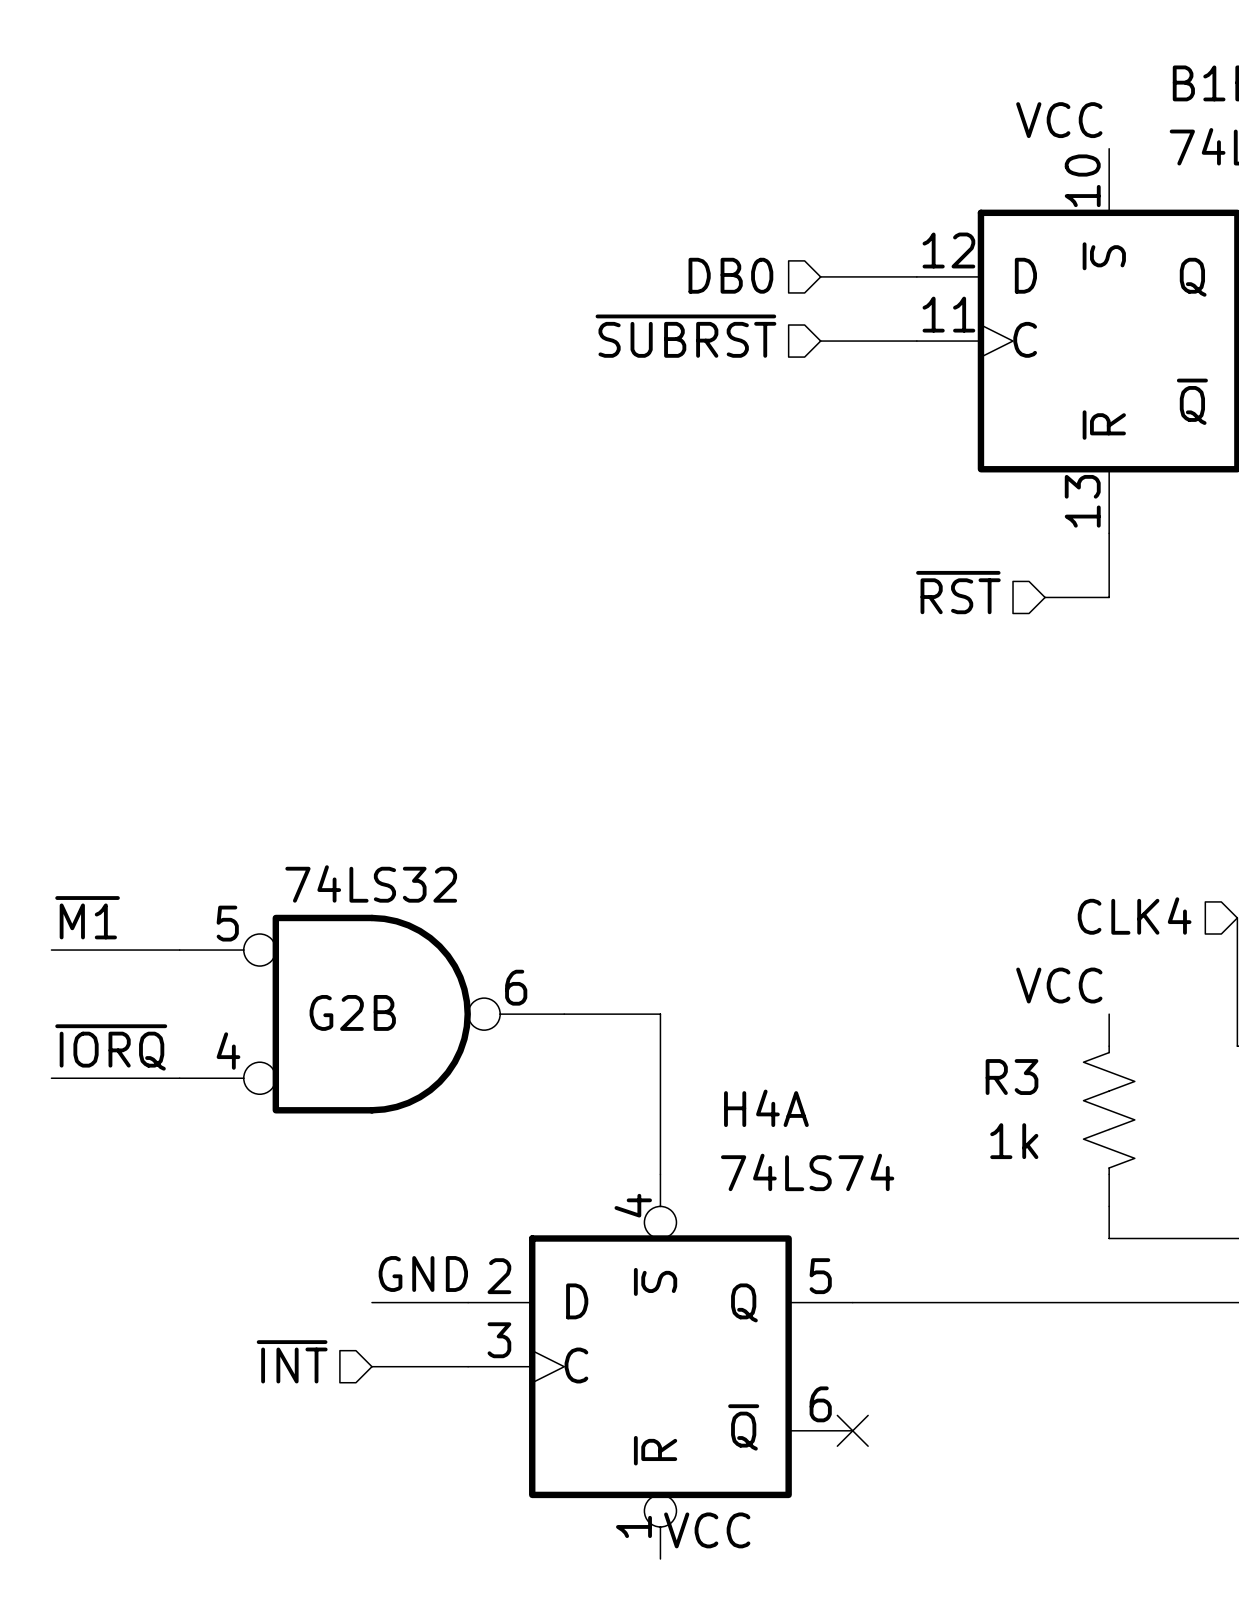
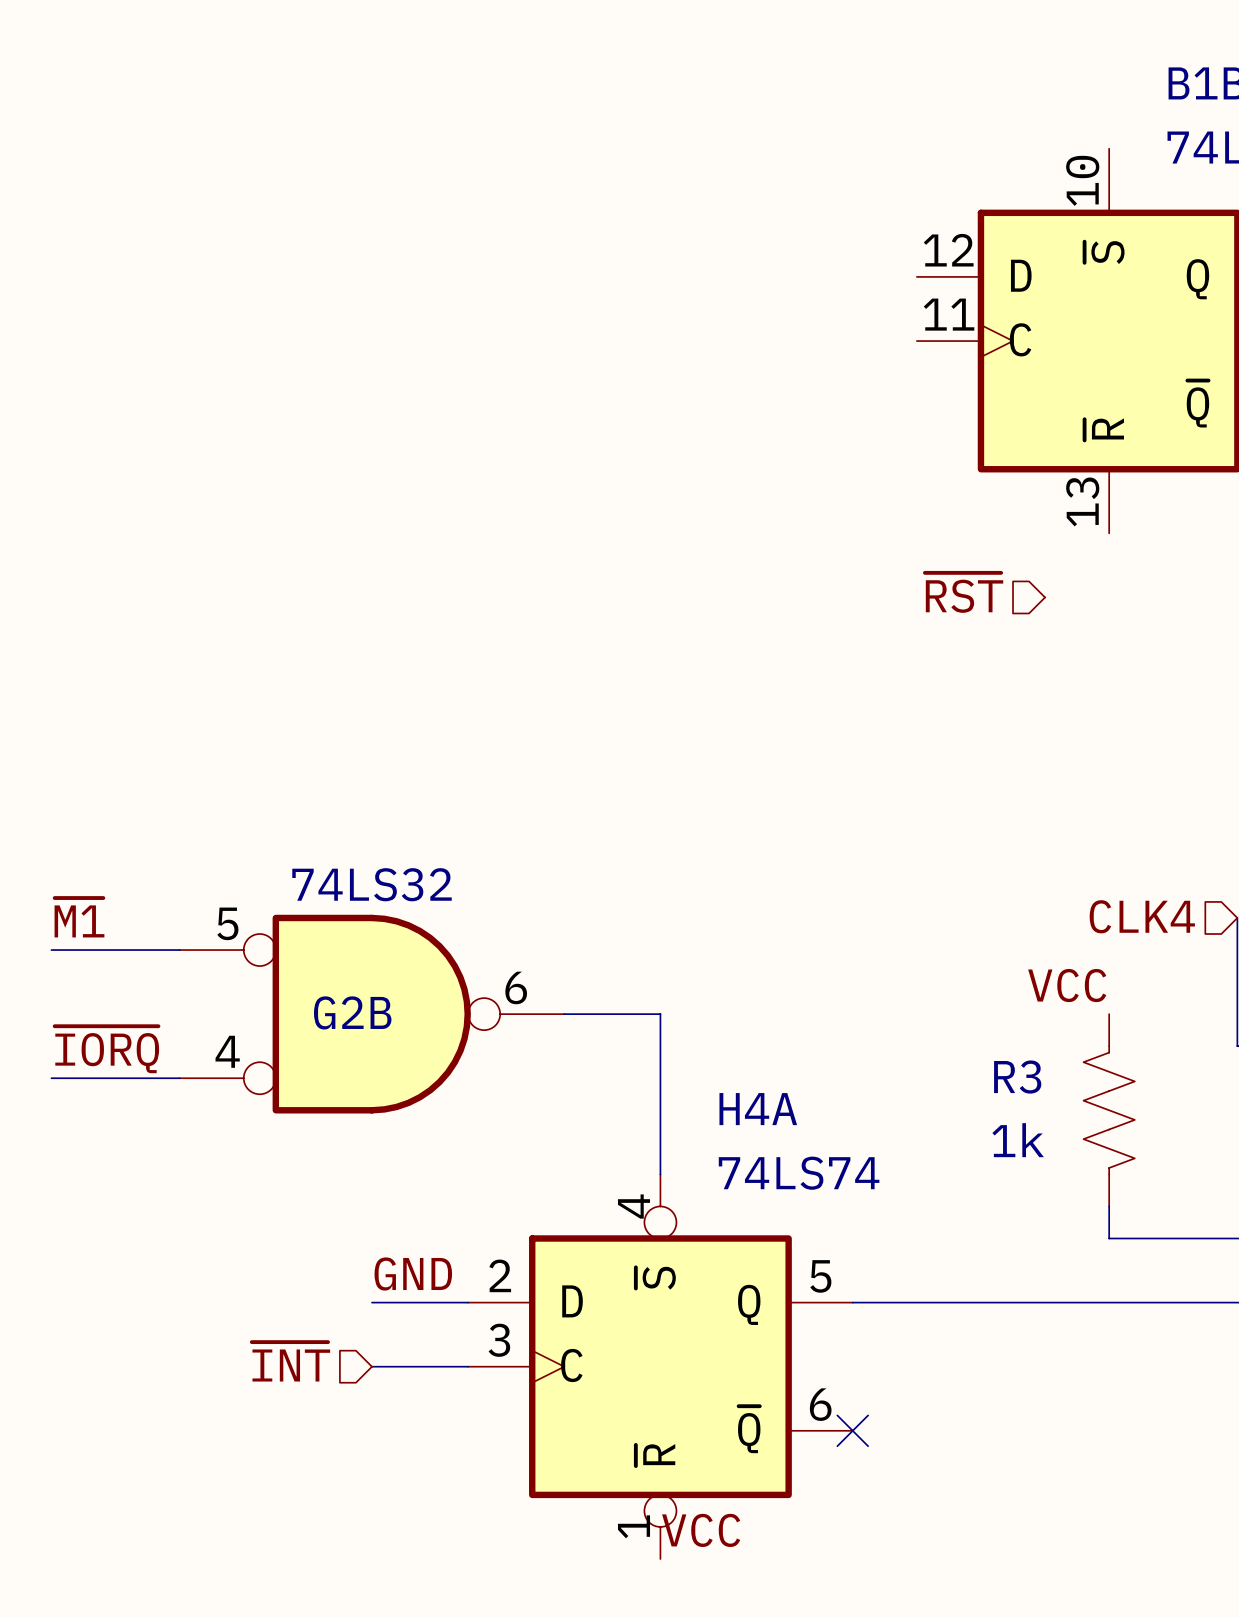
label: VCC (1059, 120) -> none
hierarchical label: DB0 (730, 275) -> none
wire: (820, 276) (916, 276) -> none
hierarchical label: ~{SUBRST} (685, 336) -> none
wire: (820, 341) (916, 341) -> none
wire: (1109, 533) (1109, 597) (1045, 597) -> none

